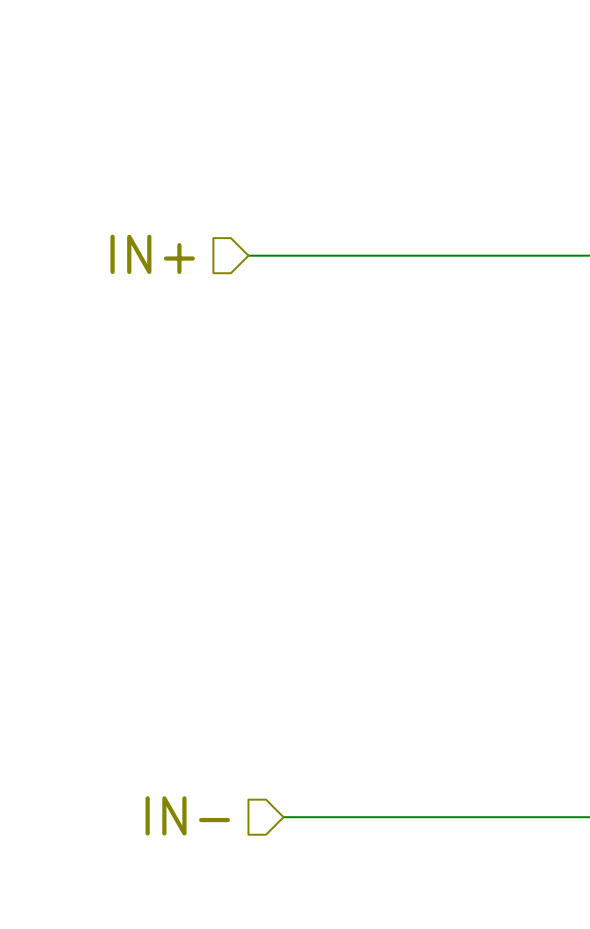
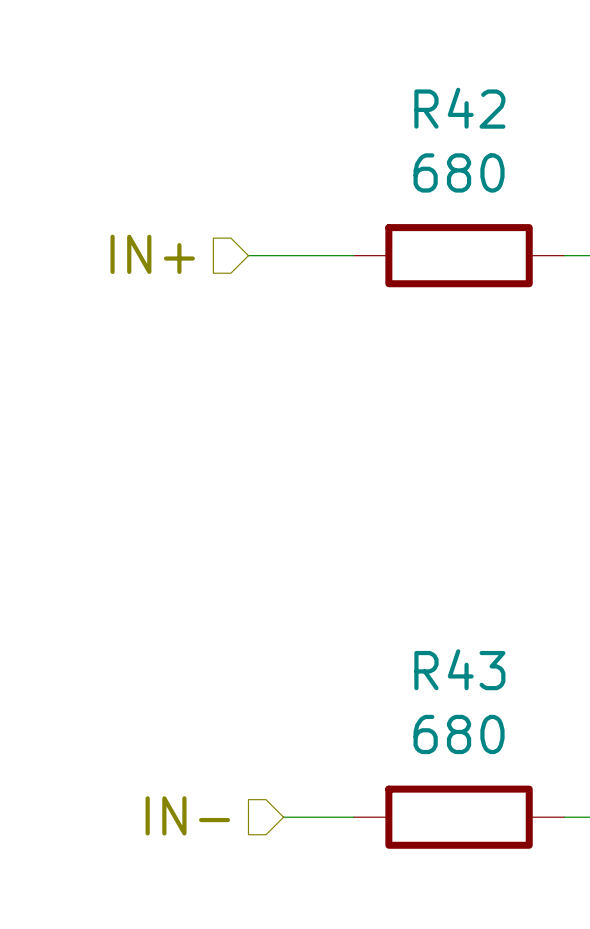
wire: (353, 255) (564, 255) -> none
R42: none -> 680 (459, 255)
wire: (353, 817) (564, 817) -> none
R43: none -> 680 (459, 817)

